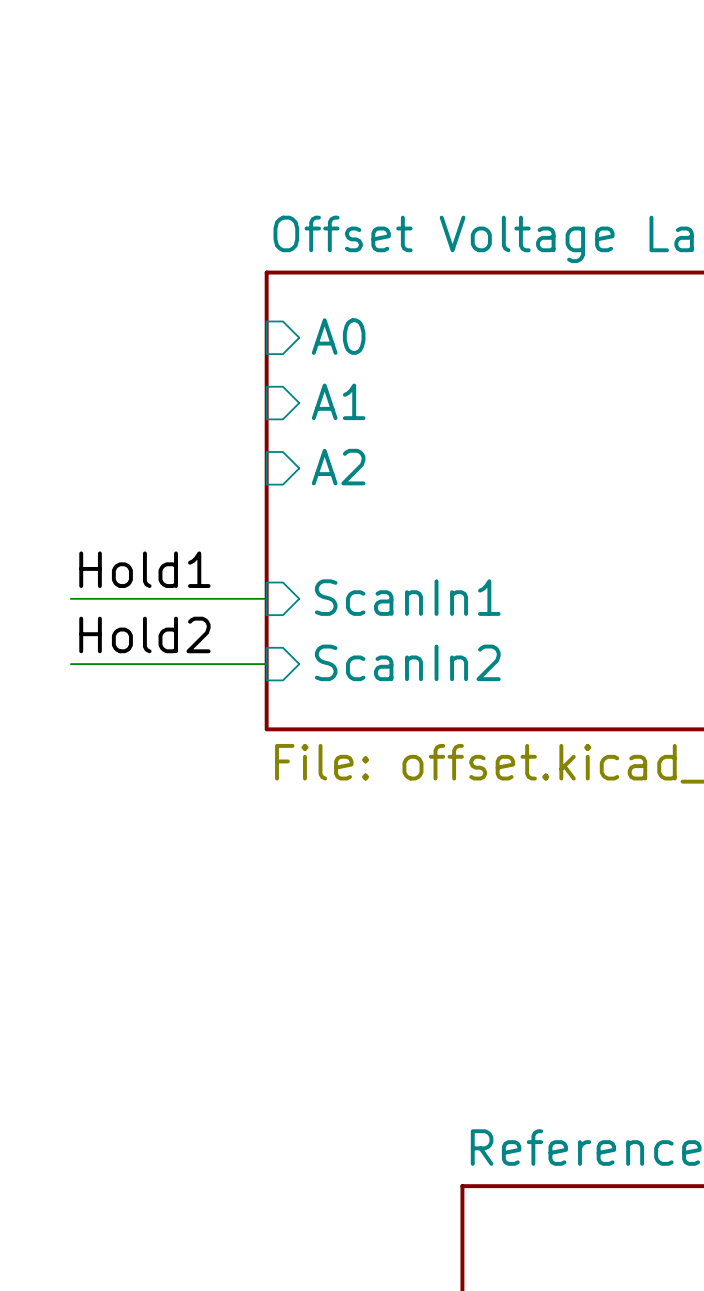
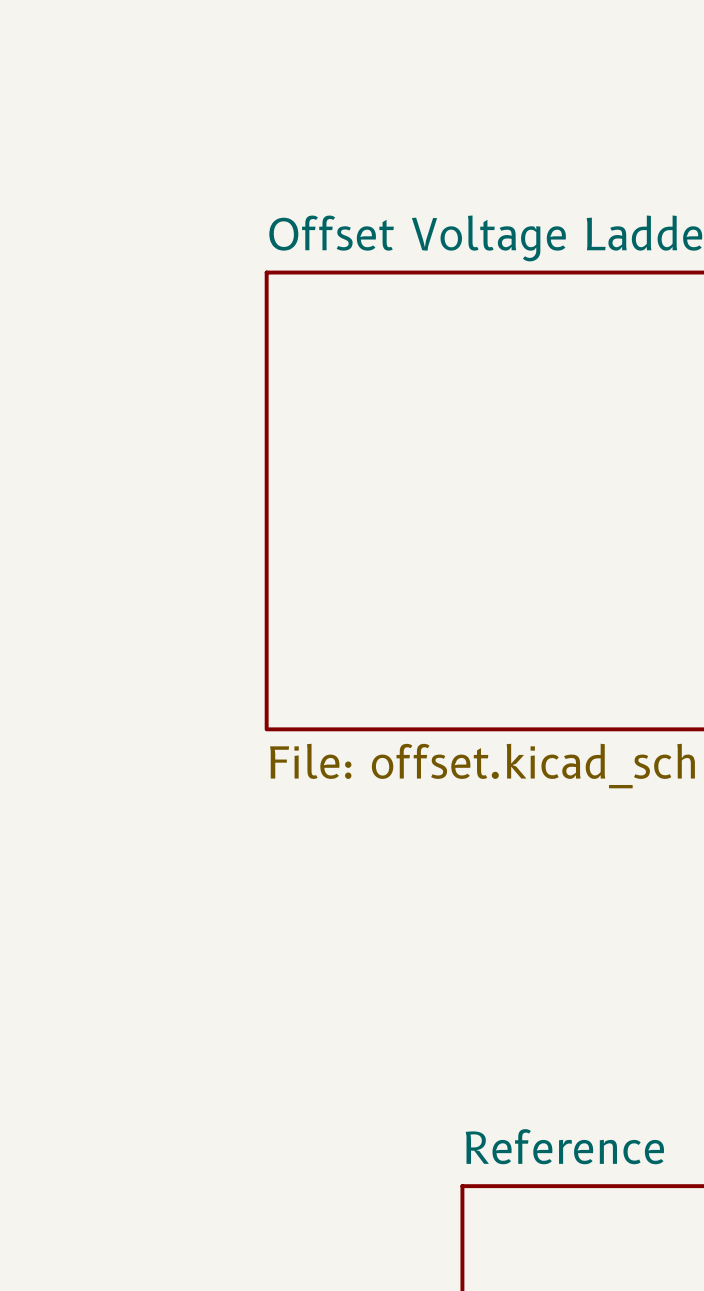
sheet pin: A0 (338, 336) -> none
sheet pin: A1 (338, 401) -> none
sheet pin: A2 (338, 467) -> none
label: Hold1 (144, 569) -> none
sheet pin: ScanIn1 (407, 597) -> none
wire: (70, 598) (266, 598) -> none
label: Hold2 (144, 634) -> none
sheet pin: ScanIn2 (407, 662) -> none
wire: (70, 664) (266, 664) -> none

